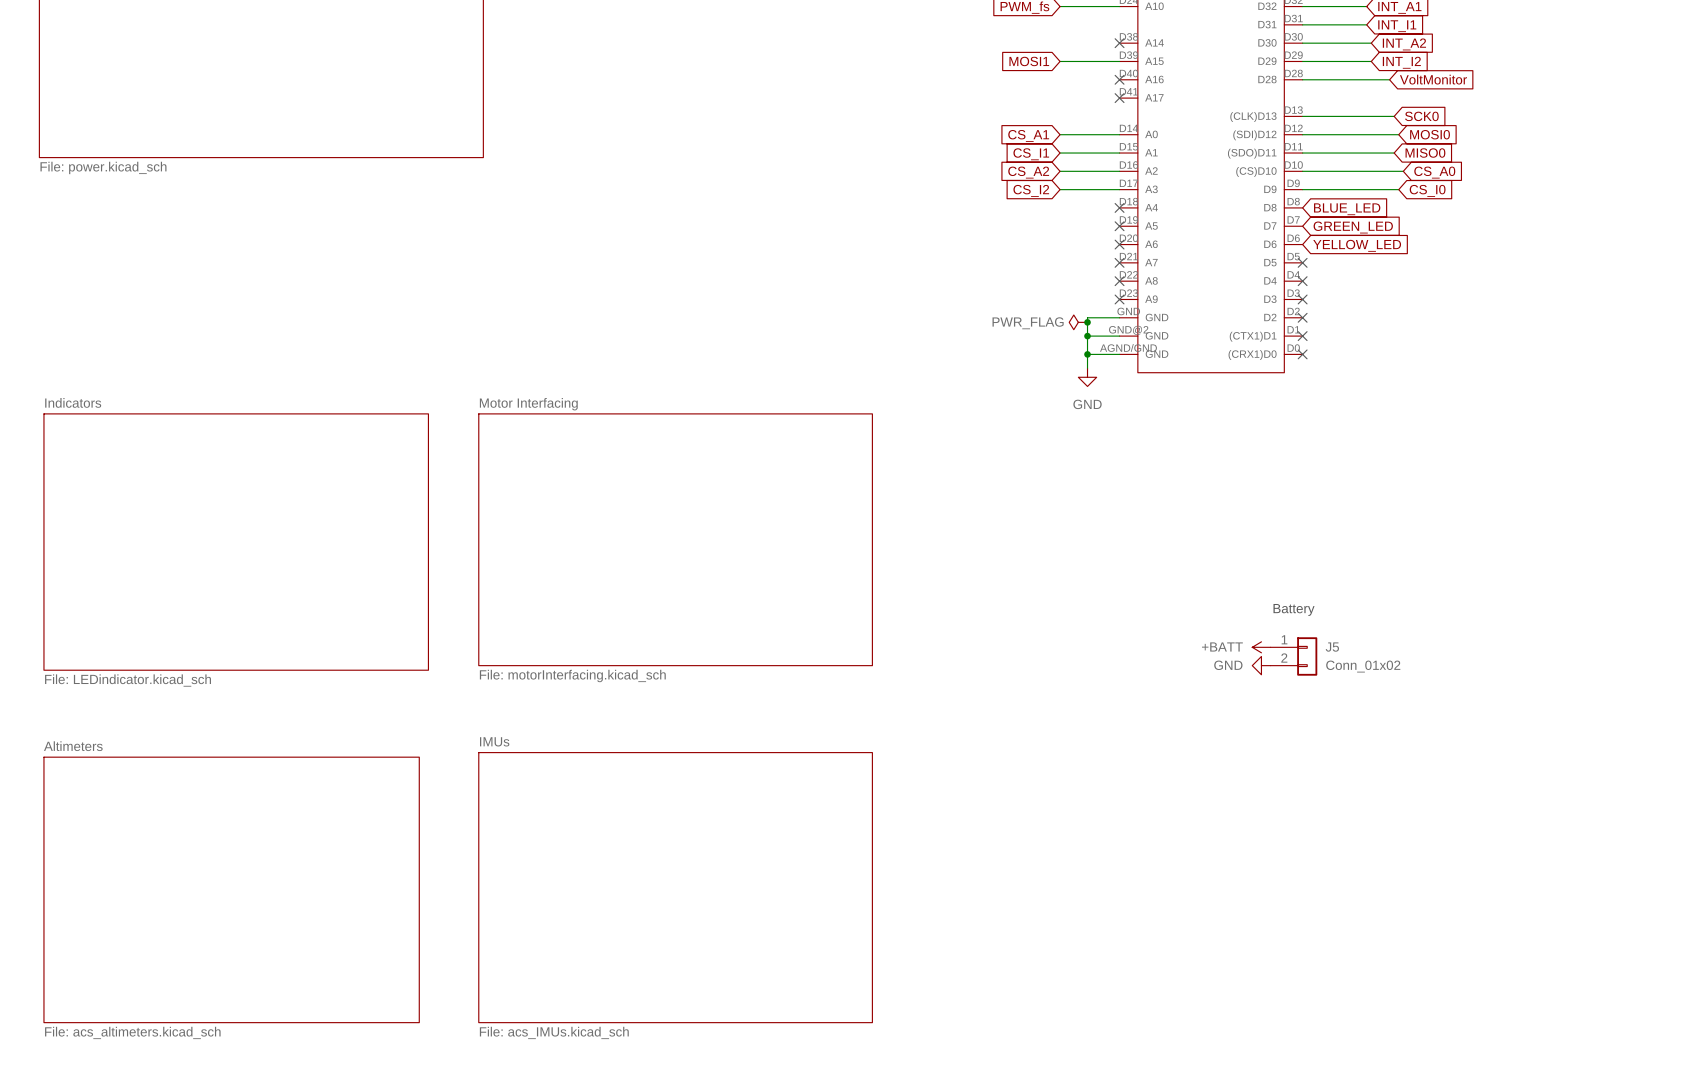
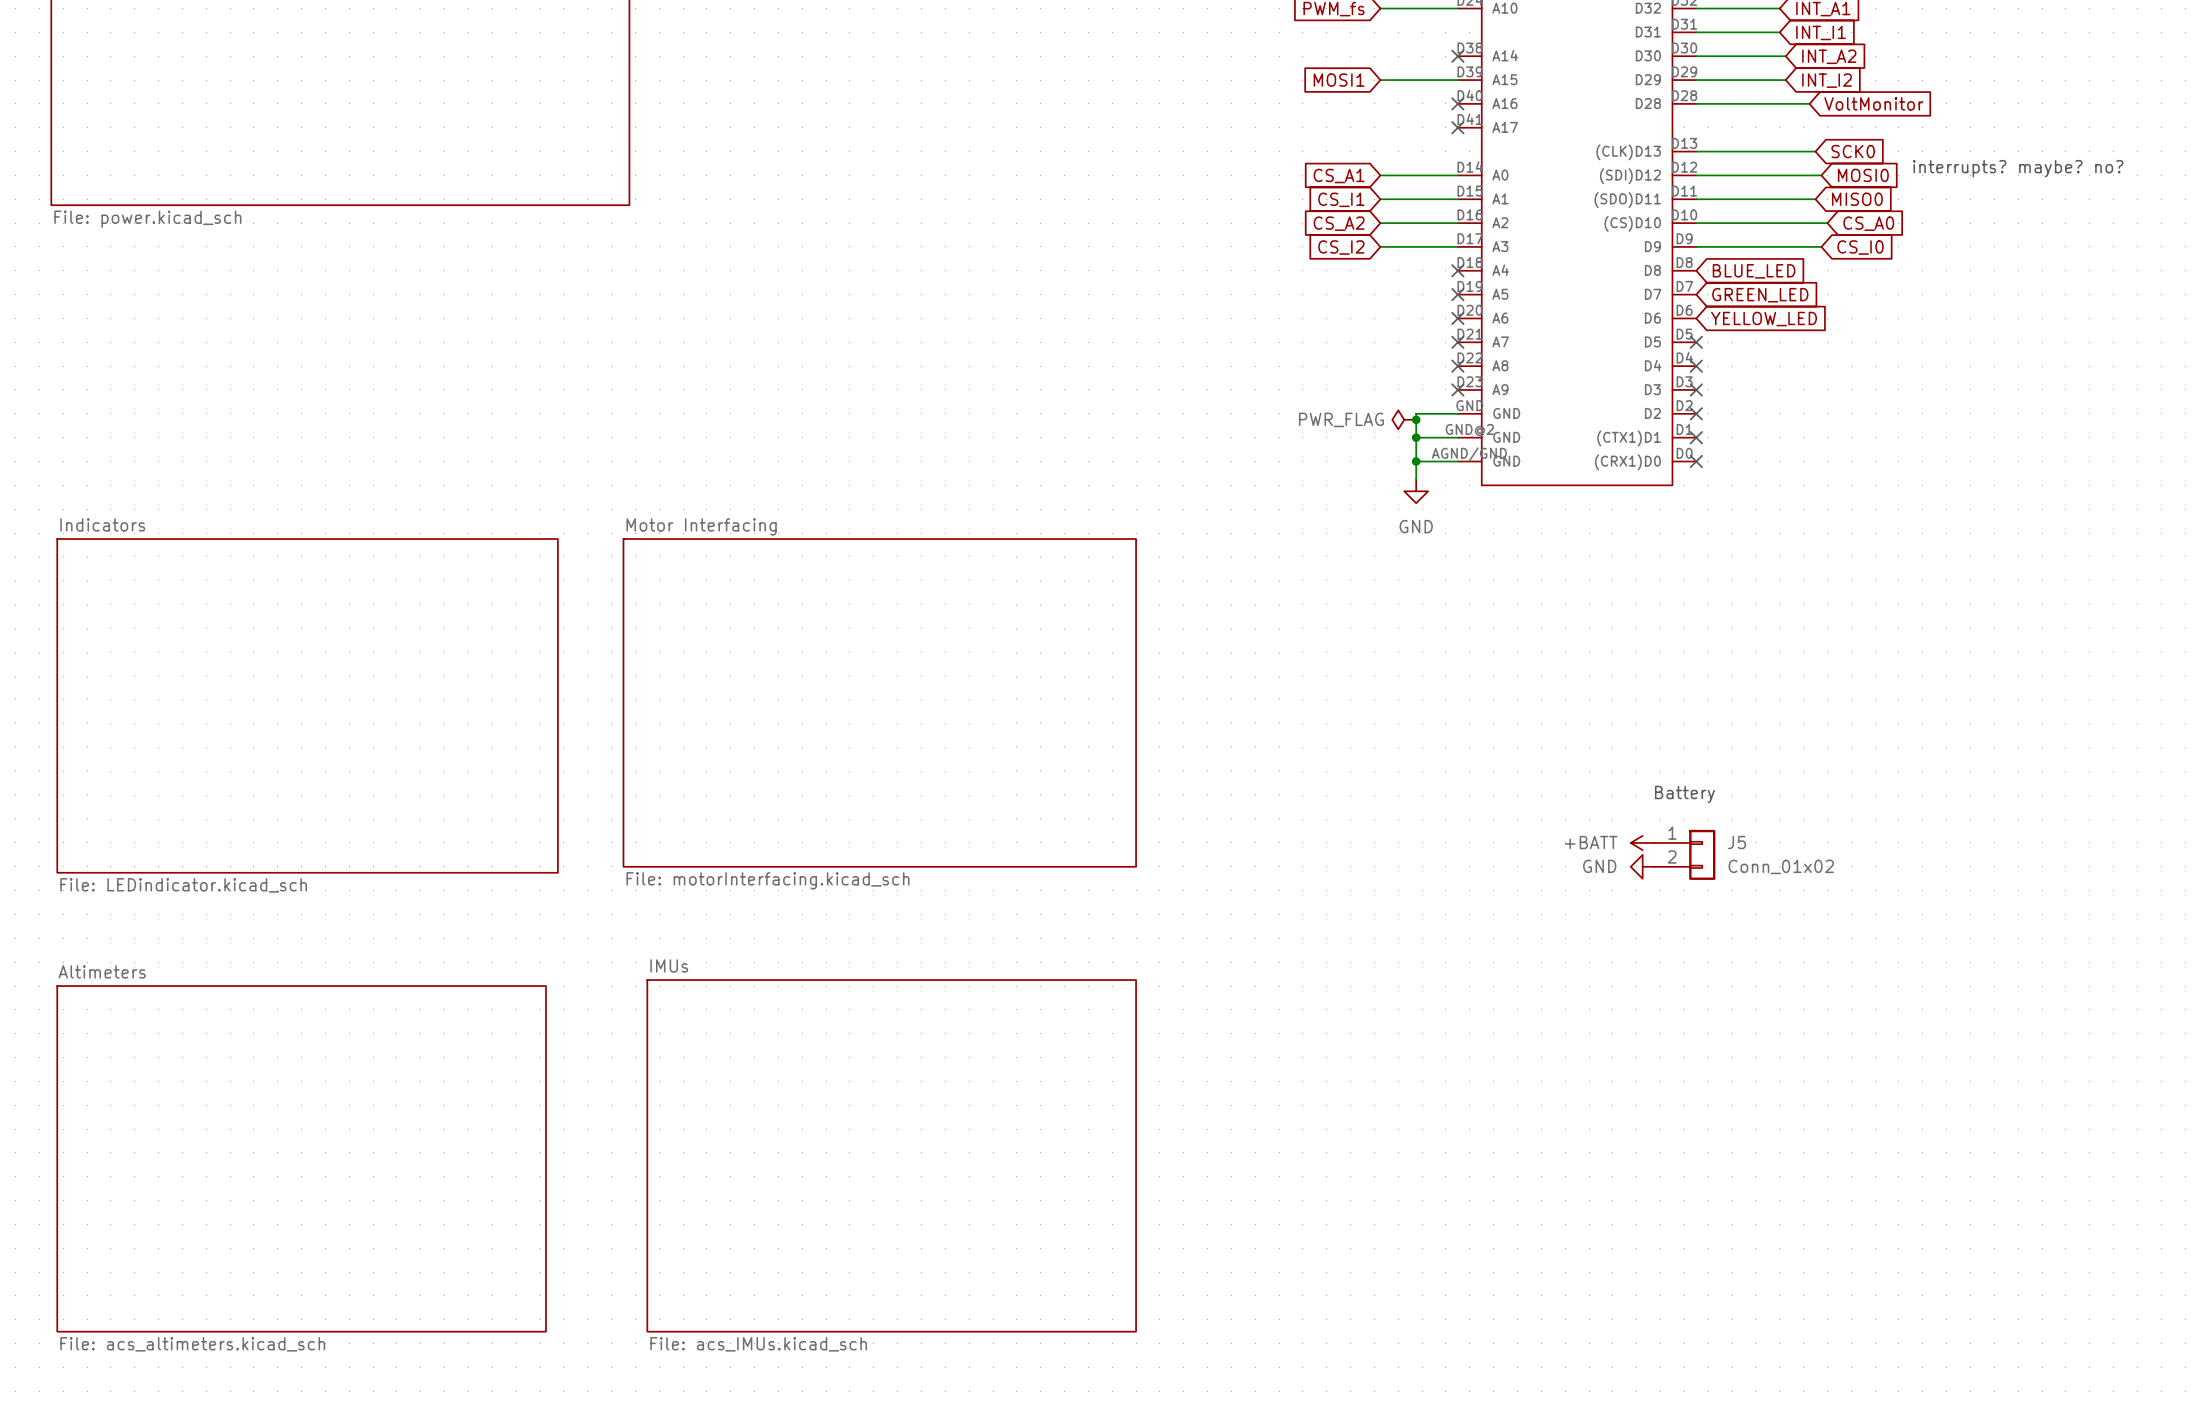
text: none -> interrupts? maybe? no? (2018, 168)
sheet IMUs: File: acs_IMUs.kicad_sch (675, 887) -> none
sheet IMUs: none -> File: acs_IMUs.kicad_sch (891, 1155)

